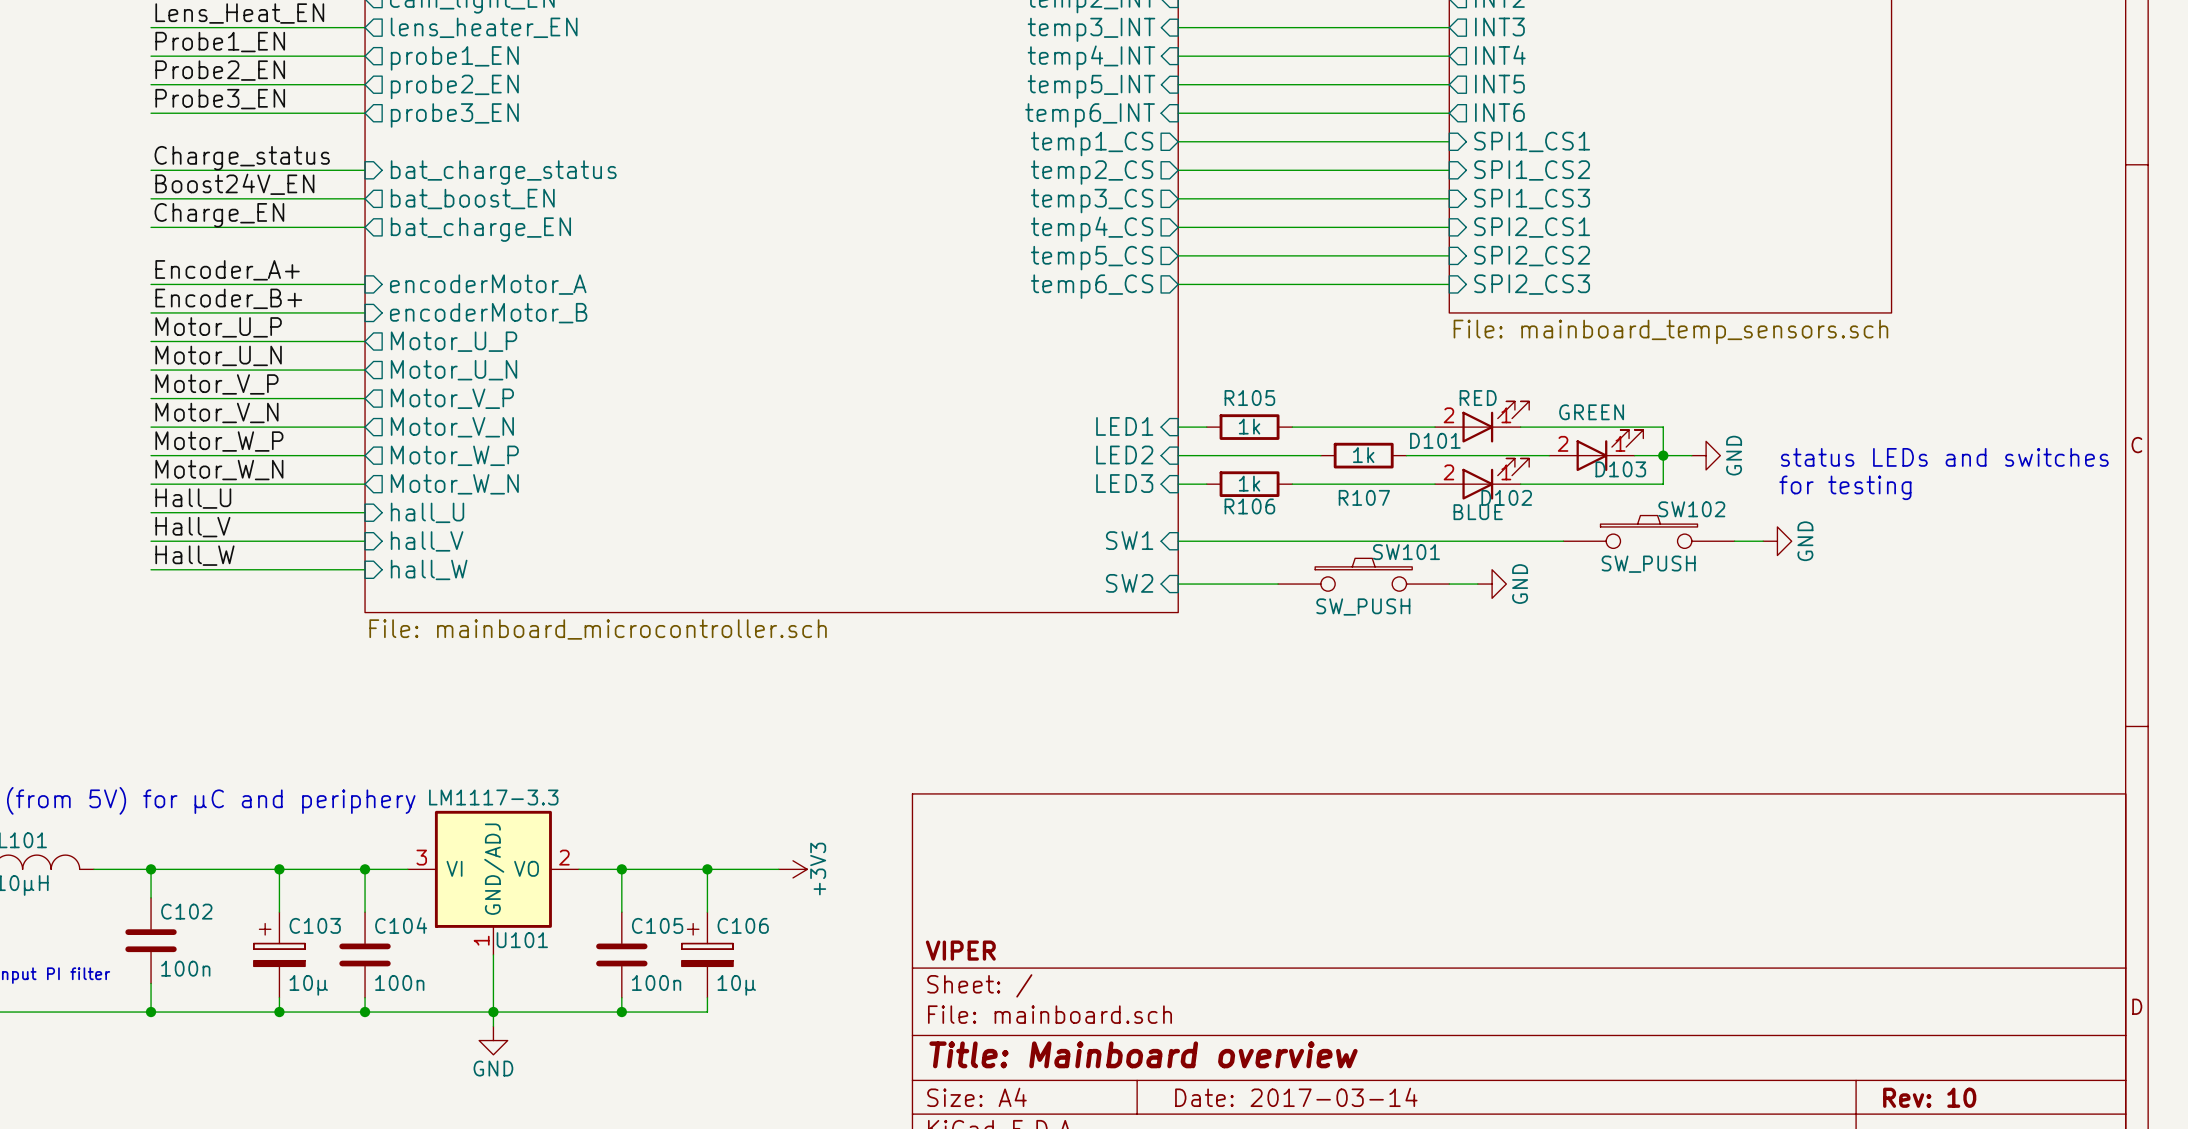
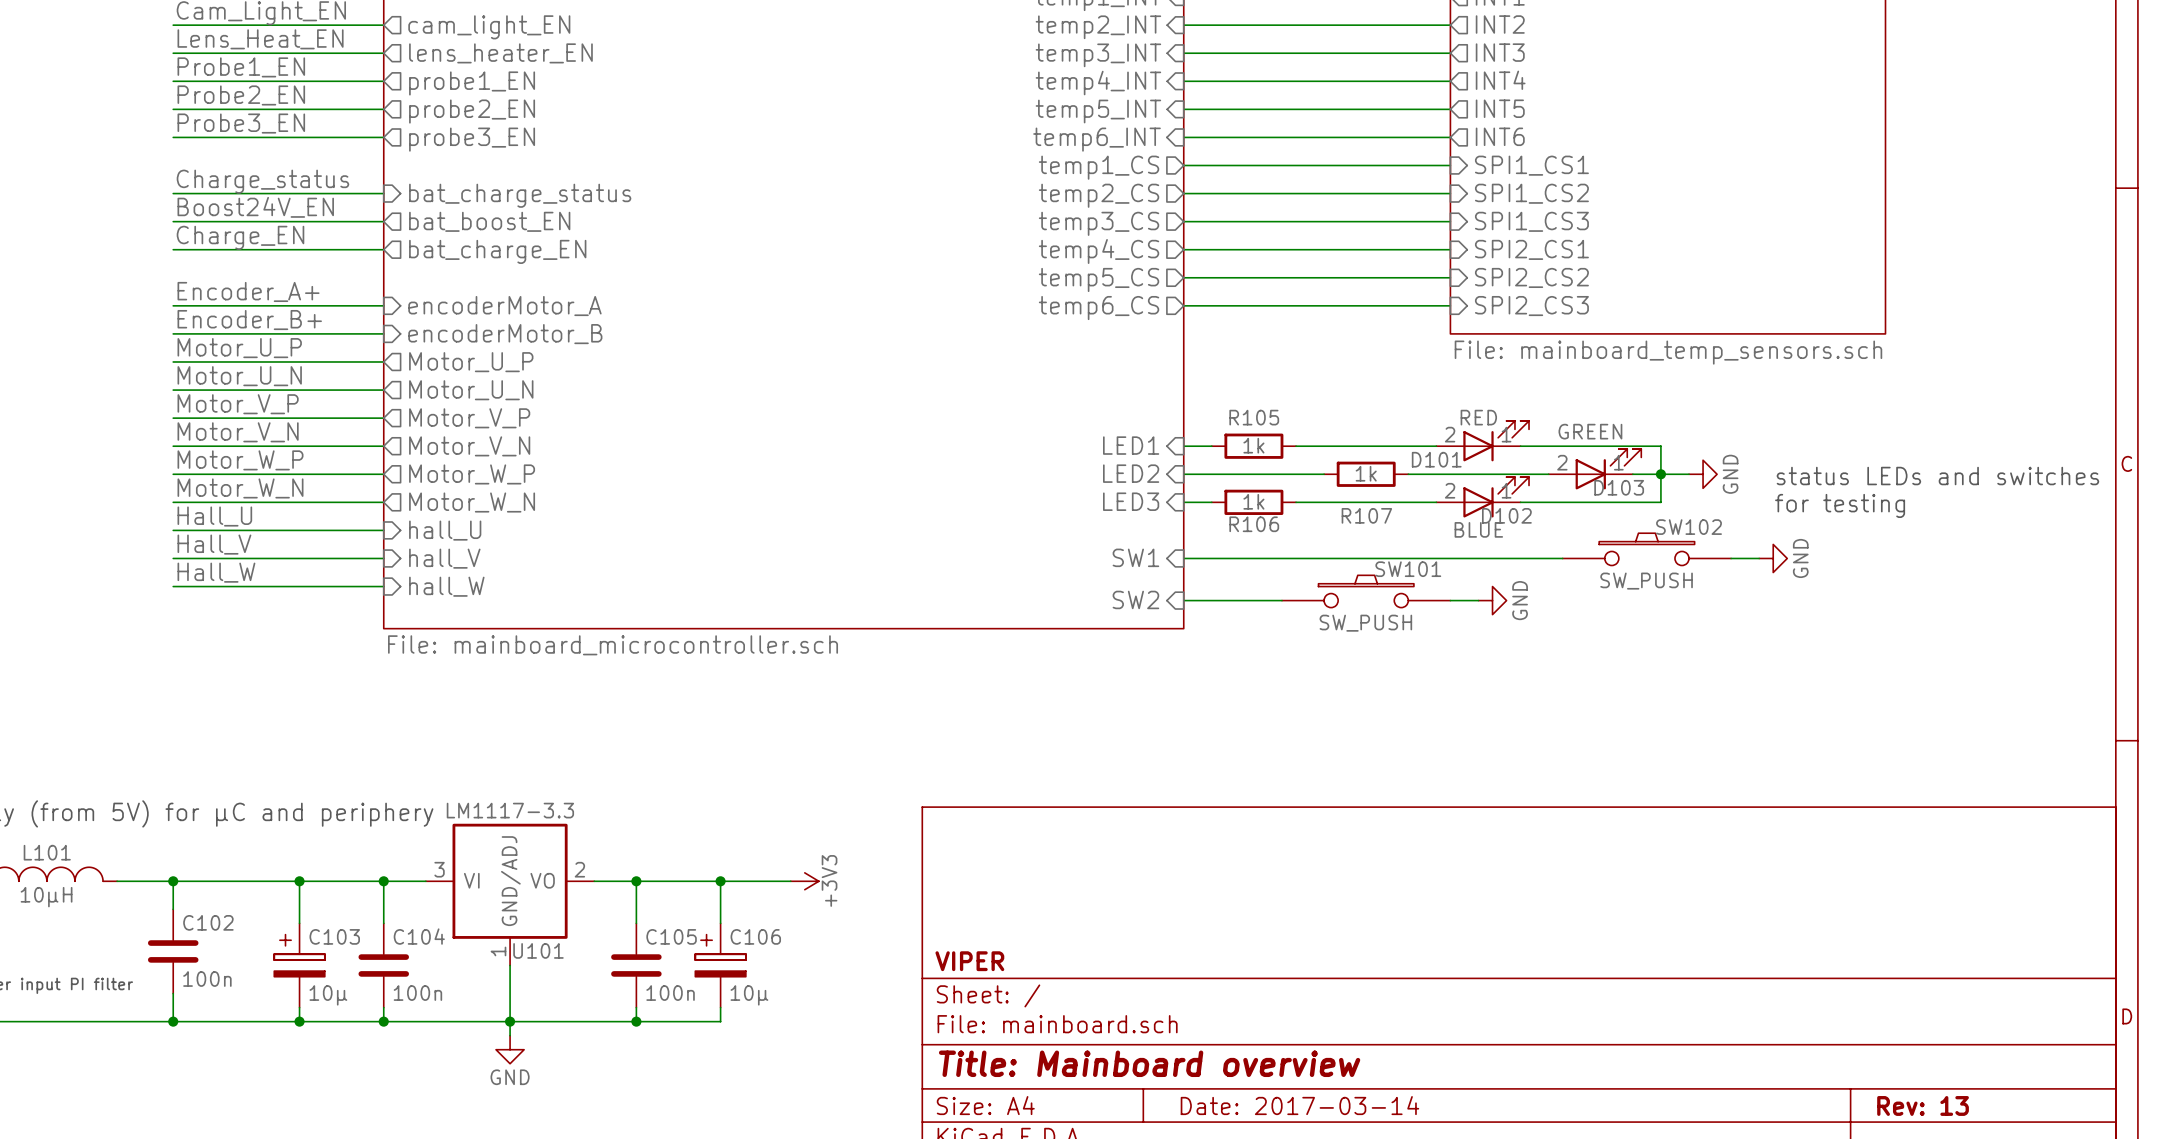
title block: Rev: 10 (1929, 1097) -> Rev: 13 (1923, 1105)

